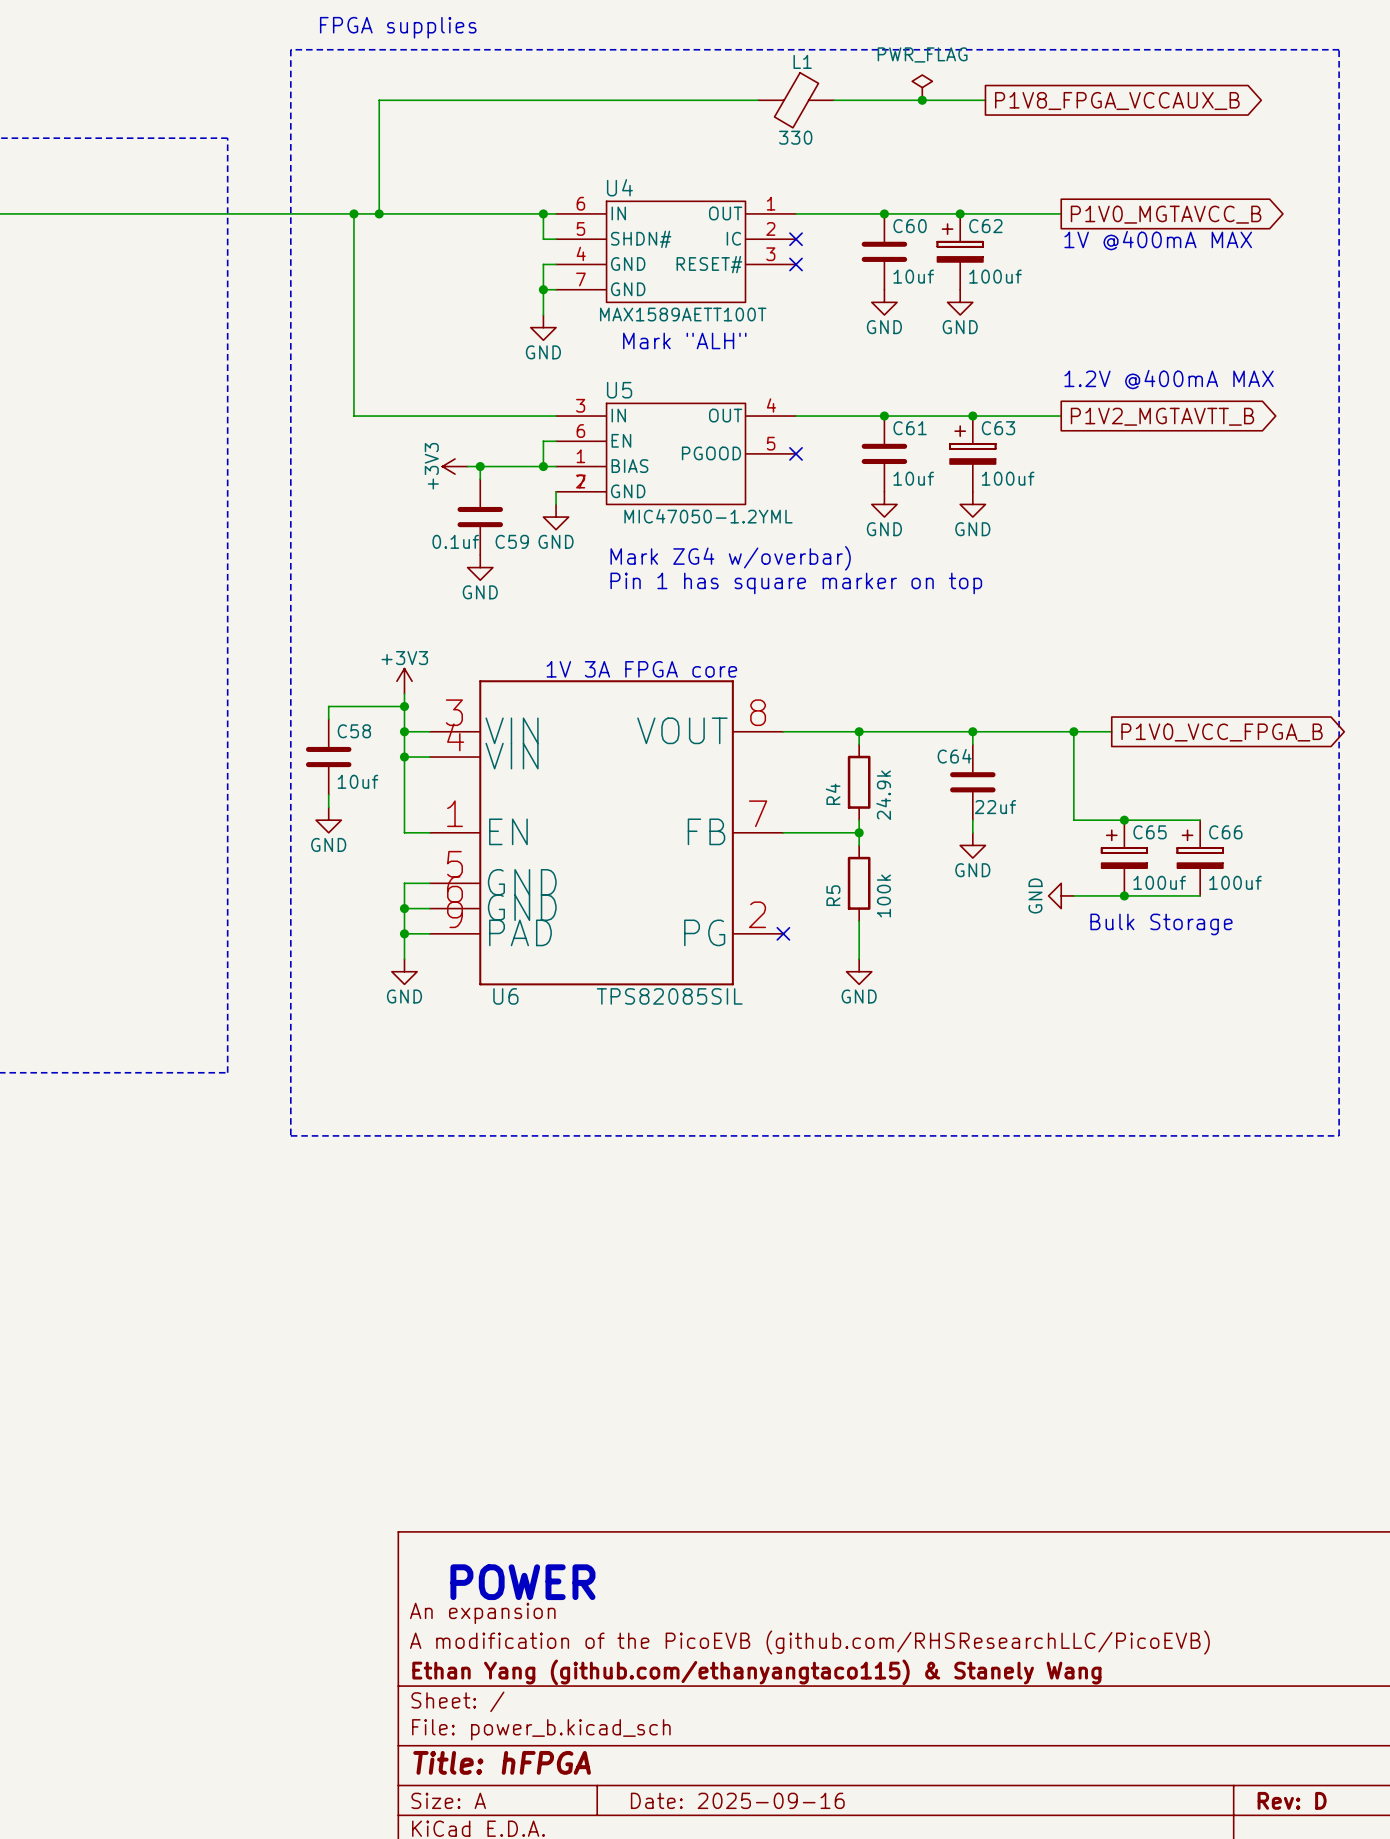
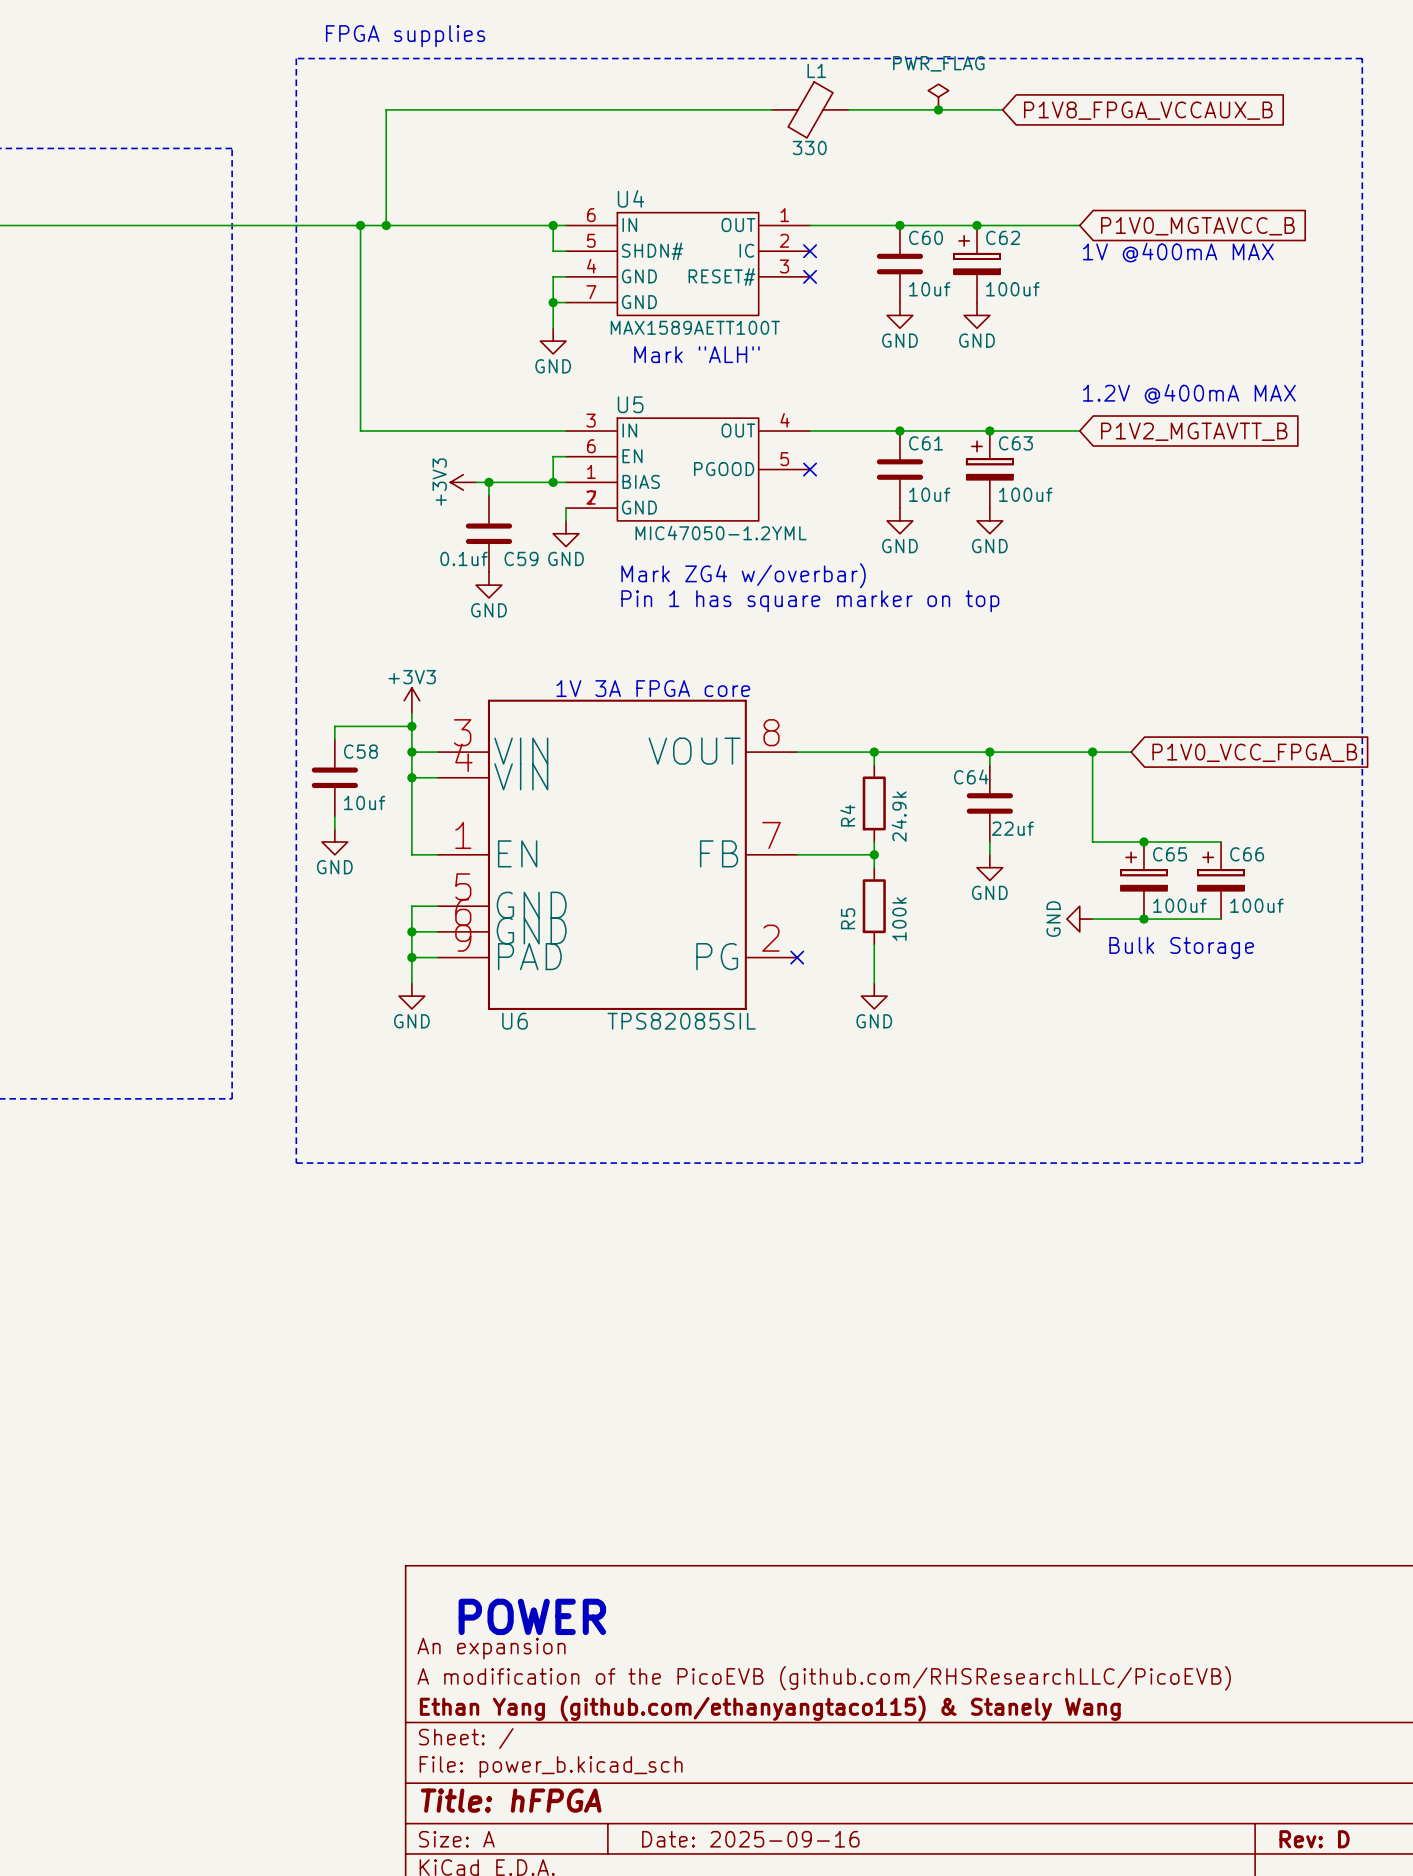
global label shape: output (1117, 101) -> input (1148, 110)
global label shape: output (1166, 214) -> input (1197, 226)
global label shape: output (1162, 416) -> input (1194, 431)
global label shape: output (1221, 732) -> input (1254, 752)

